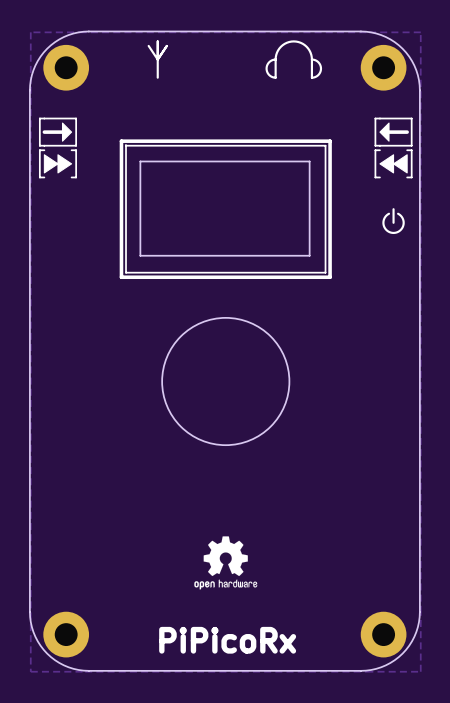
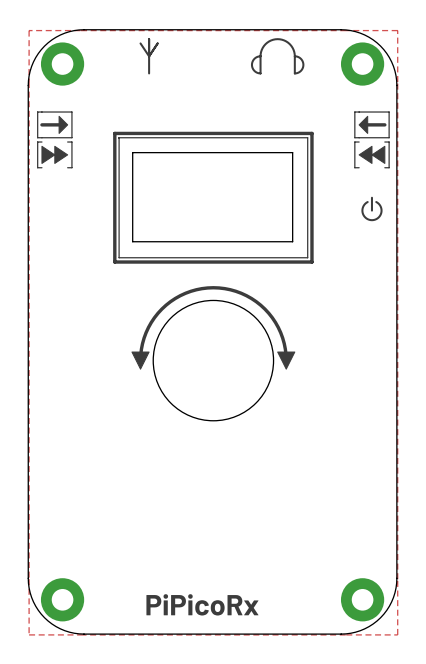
drawing: none -> [131, 351, 150, 370]
drawing: none -> [277, 351, 296, 370]
line: none -> (140, 360) (146, 332) (161, 309) (185, 293) (213, 287) (241, 293) (264, 309) (280, 332) (286, 360)
drawing: [194, 536, 258, 590] -> none

